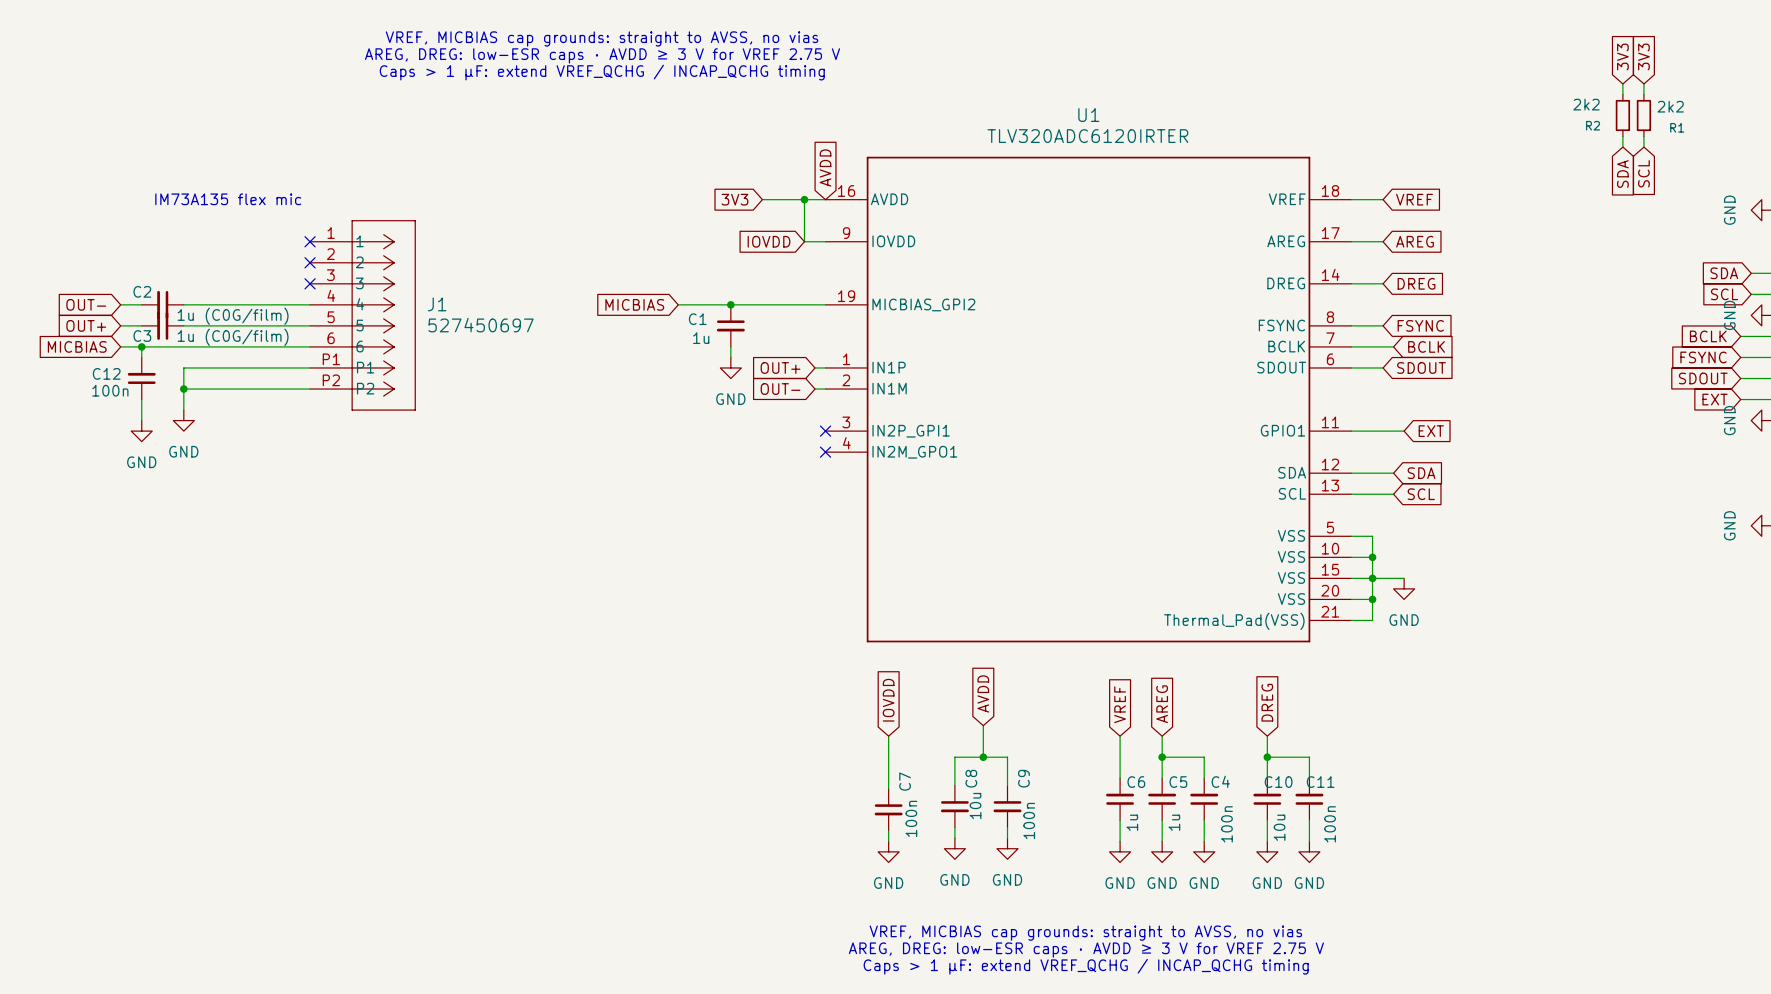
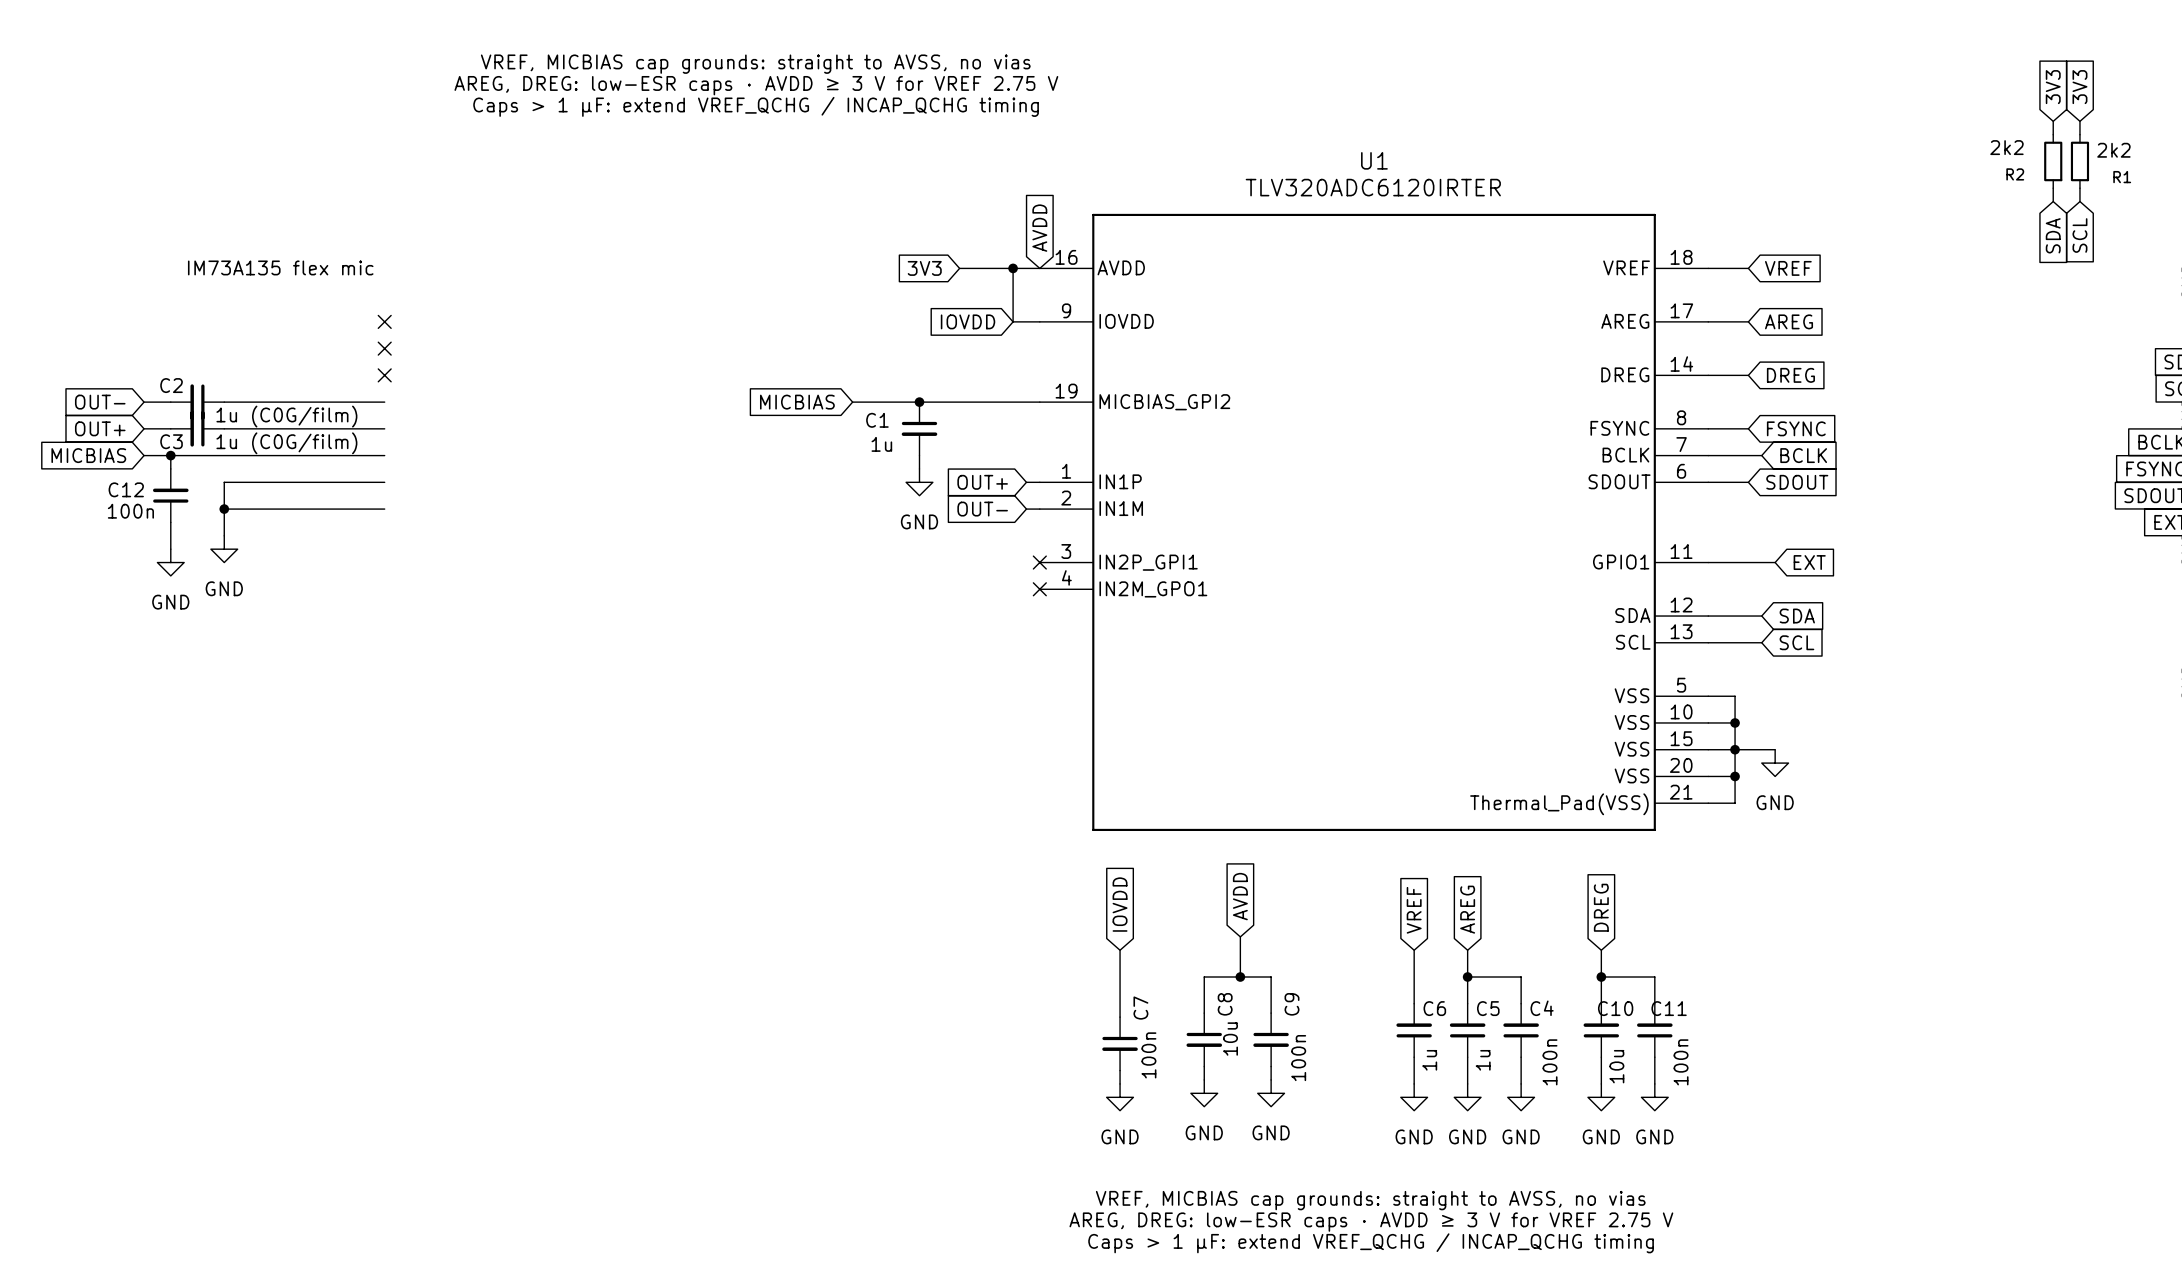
J1: 527450697 (362, 315) -> none

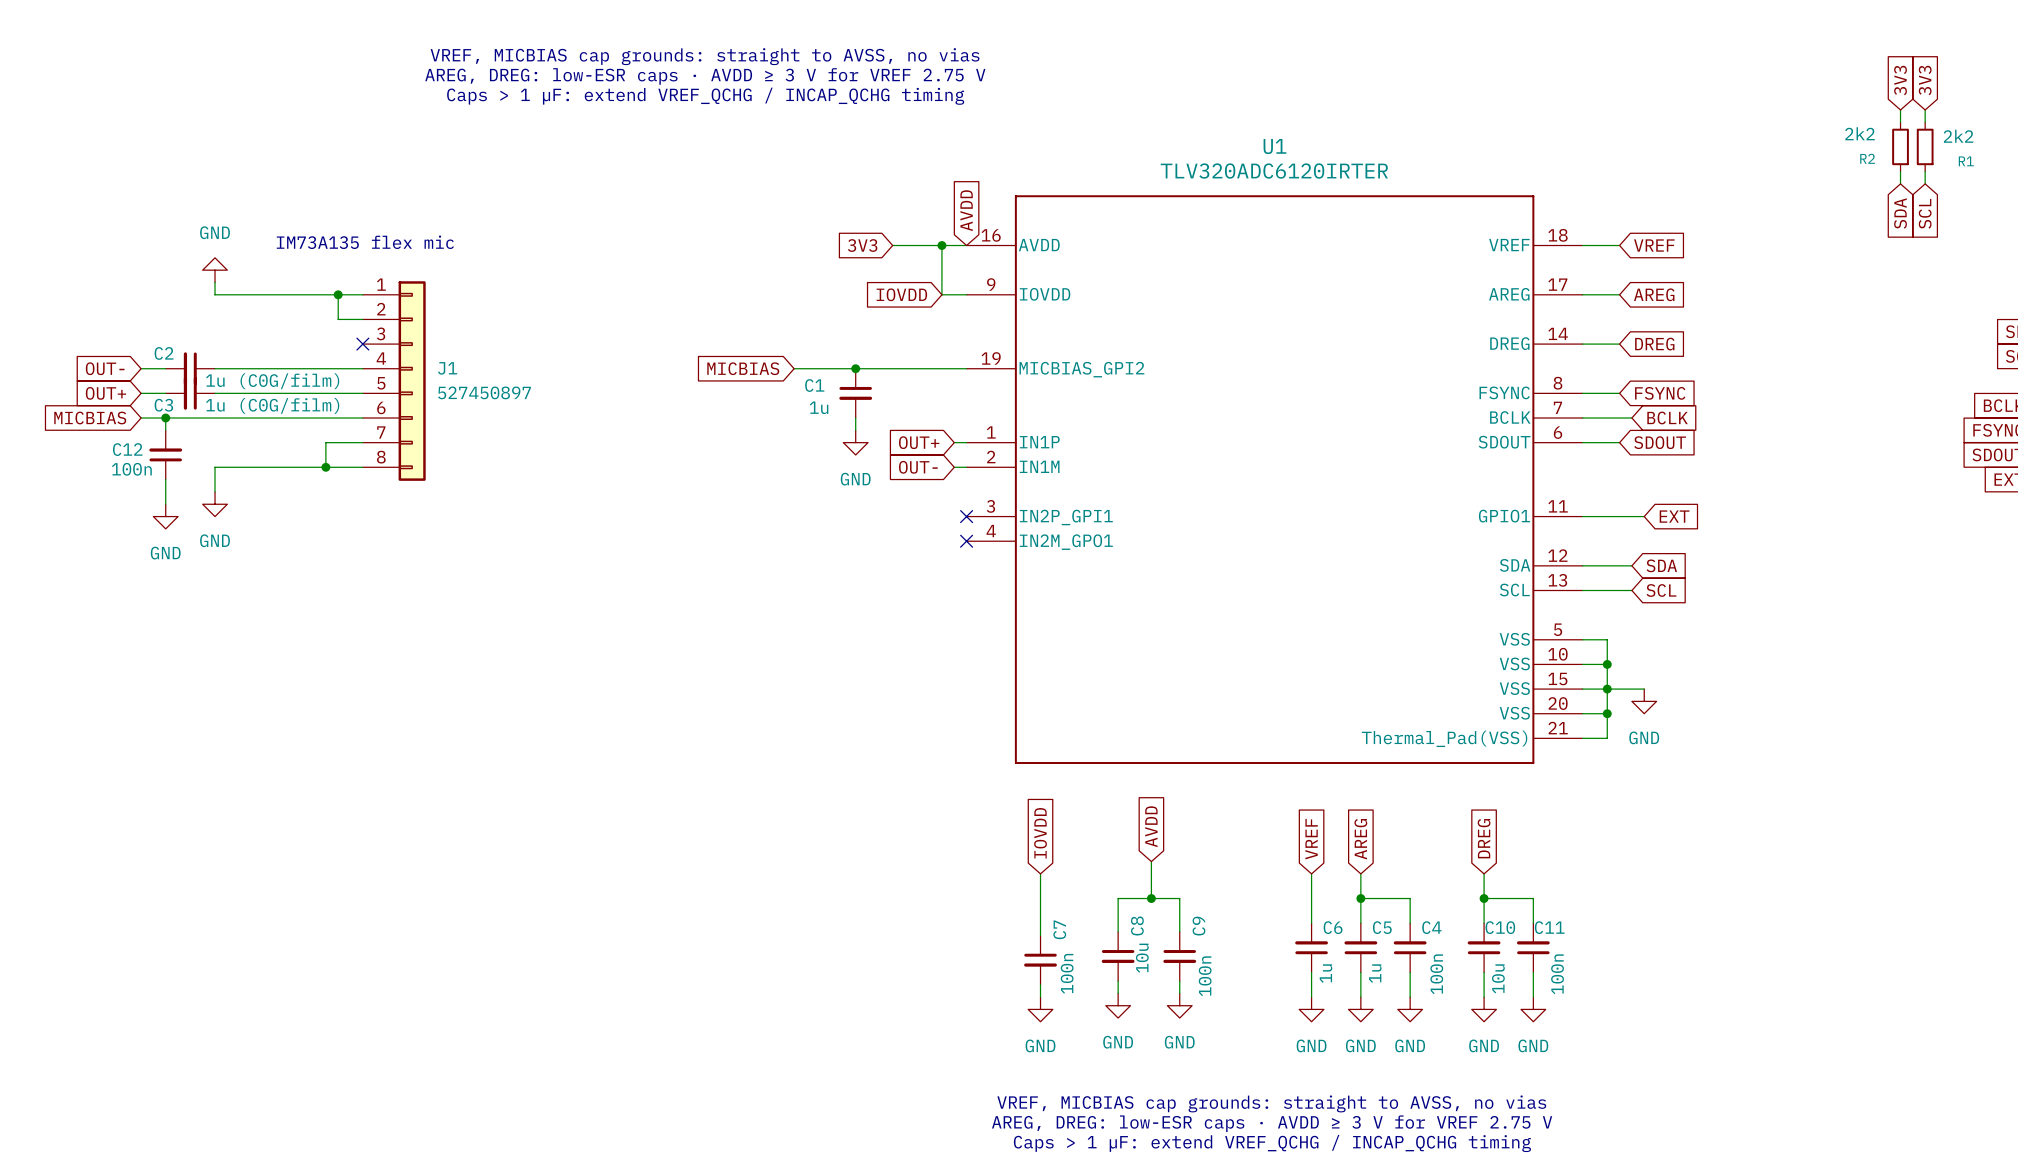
text position: IM73A135 flex mic (280, 267) -> IM73A135 flex mic (365, 242)
power symbol: none -> GND (215, 270)
wire: none -> (215, 282) (215, 294) (362, 294)
wire: none -> (338, 294) (338, 319) (362, 319)
junction: none -> (338, 294)
no-connect mark: (384, 321) -> none
no-connect mark: (384, 348) -> none
J1: none -> 527450897 (394, 381)
wire: (344, 482) (224, 482) (224, 509) -> (325, 442) (325, 467)
junction: (224, 509) -> none
junction: none -> (325, 467)

